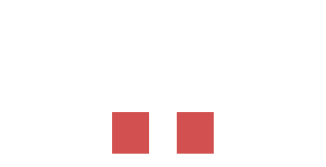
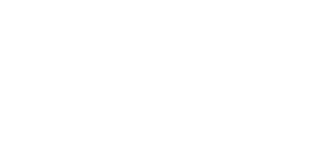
part: (162, 132) -> none

